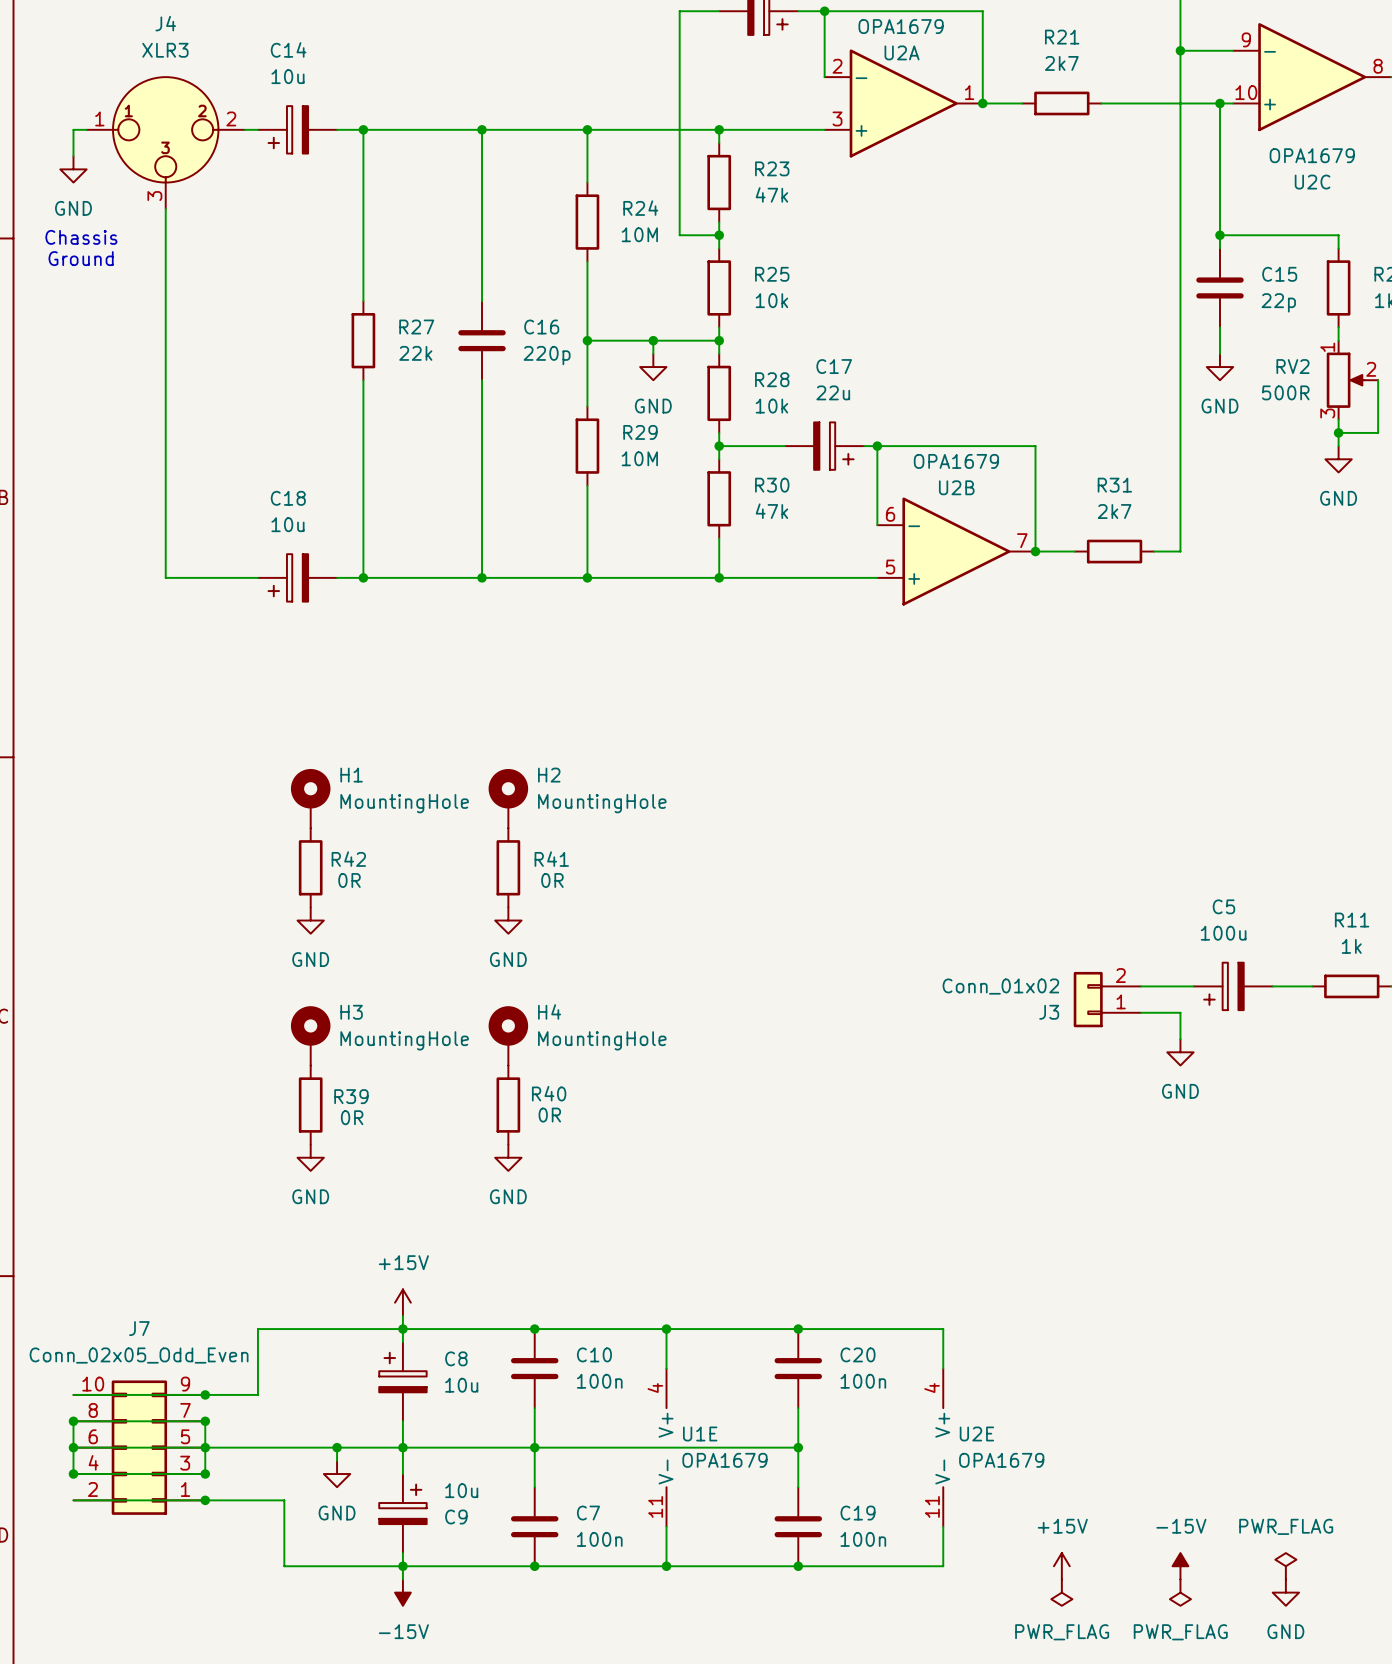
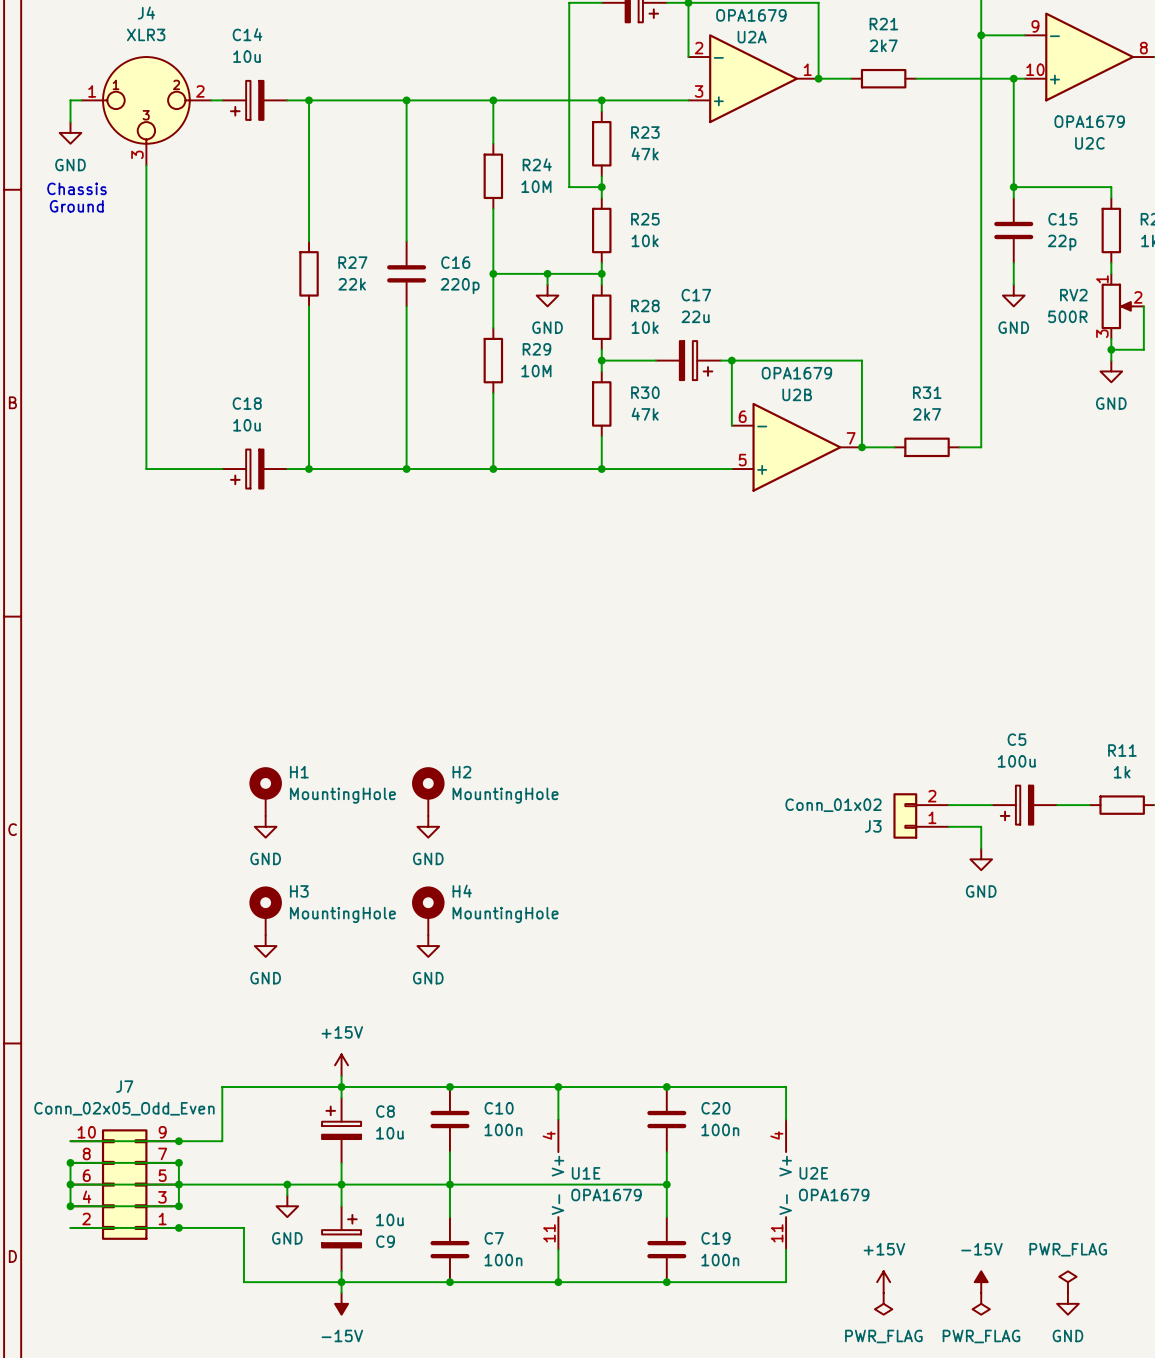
H1 position: (310, 798) -> (265, 791)
H2 position: (508, 798) -> (428, 791)
R42: 0R (310, 867) -> none
R41: 0R (508, 867) -> none
power symbol position: GND (310, 920) -> GND (265, 826)
power symbol position: GND (508, 920) -> GND (428, 826)
H3 position: (310, 1035) -> (265, 910)
H4 position: (508, 1035) -> (428, 910)
R39: 0R (310, 1105) -> none
R40: 0R (508, 1105) -> none

